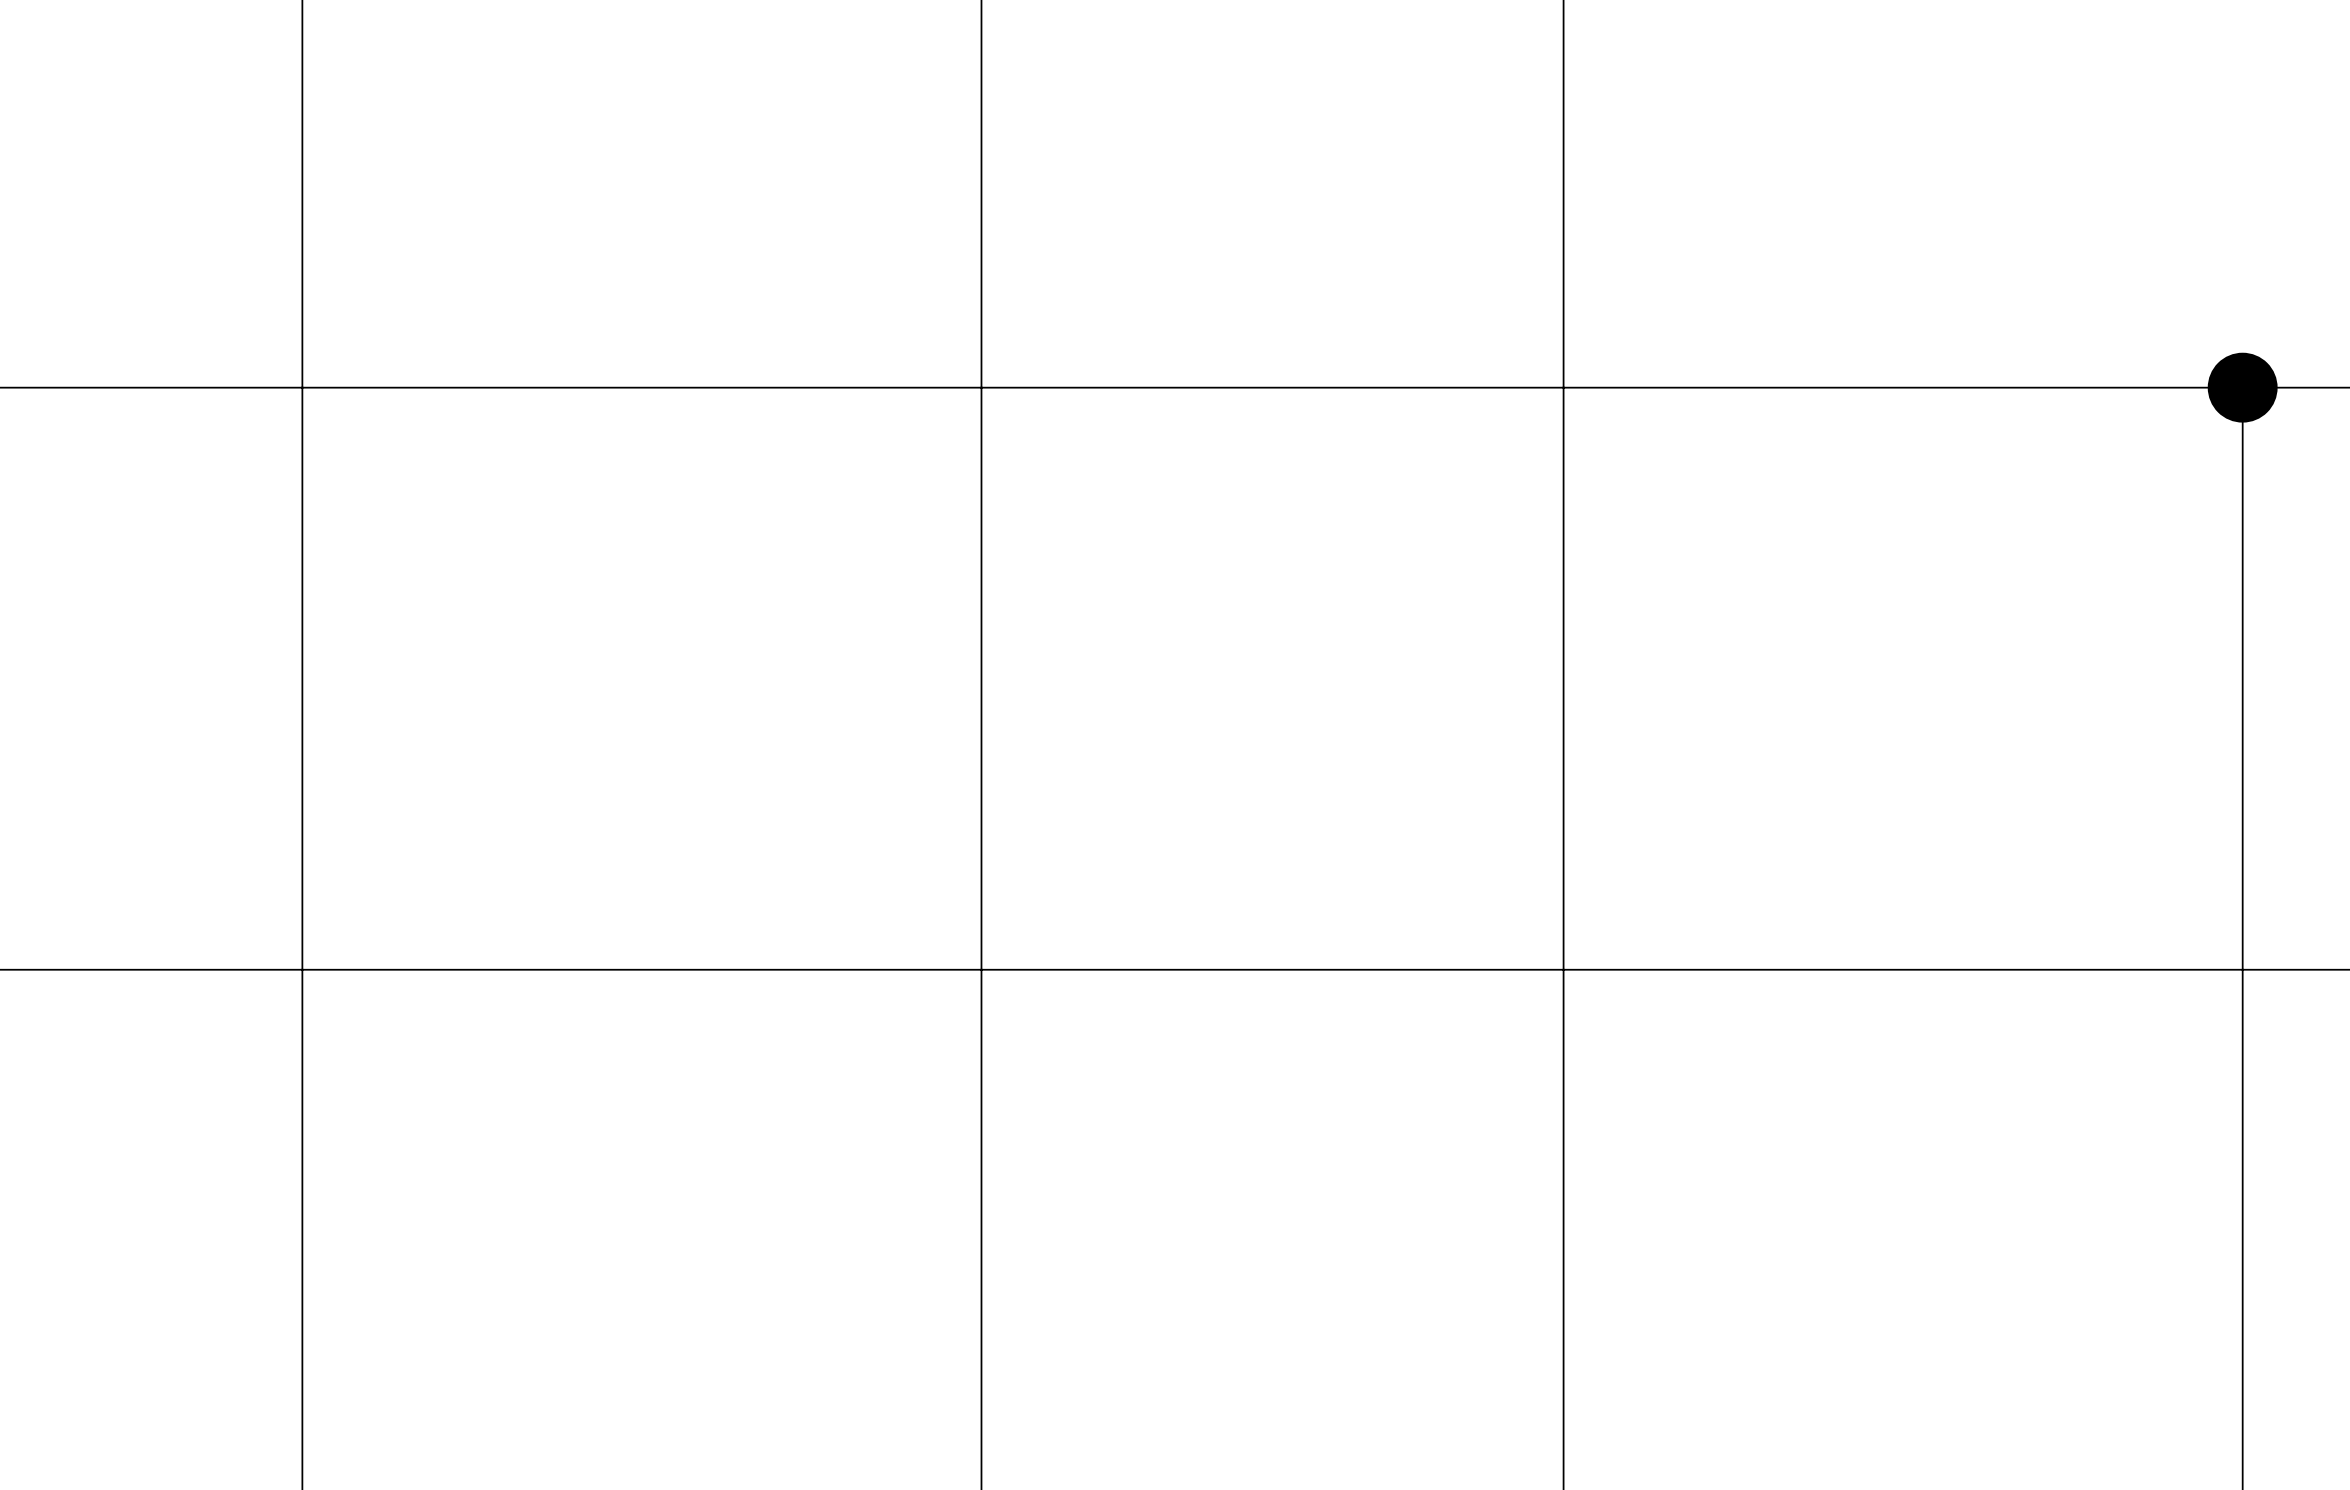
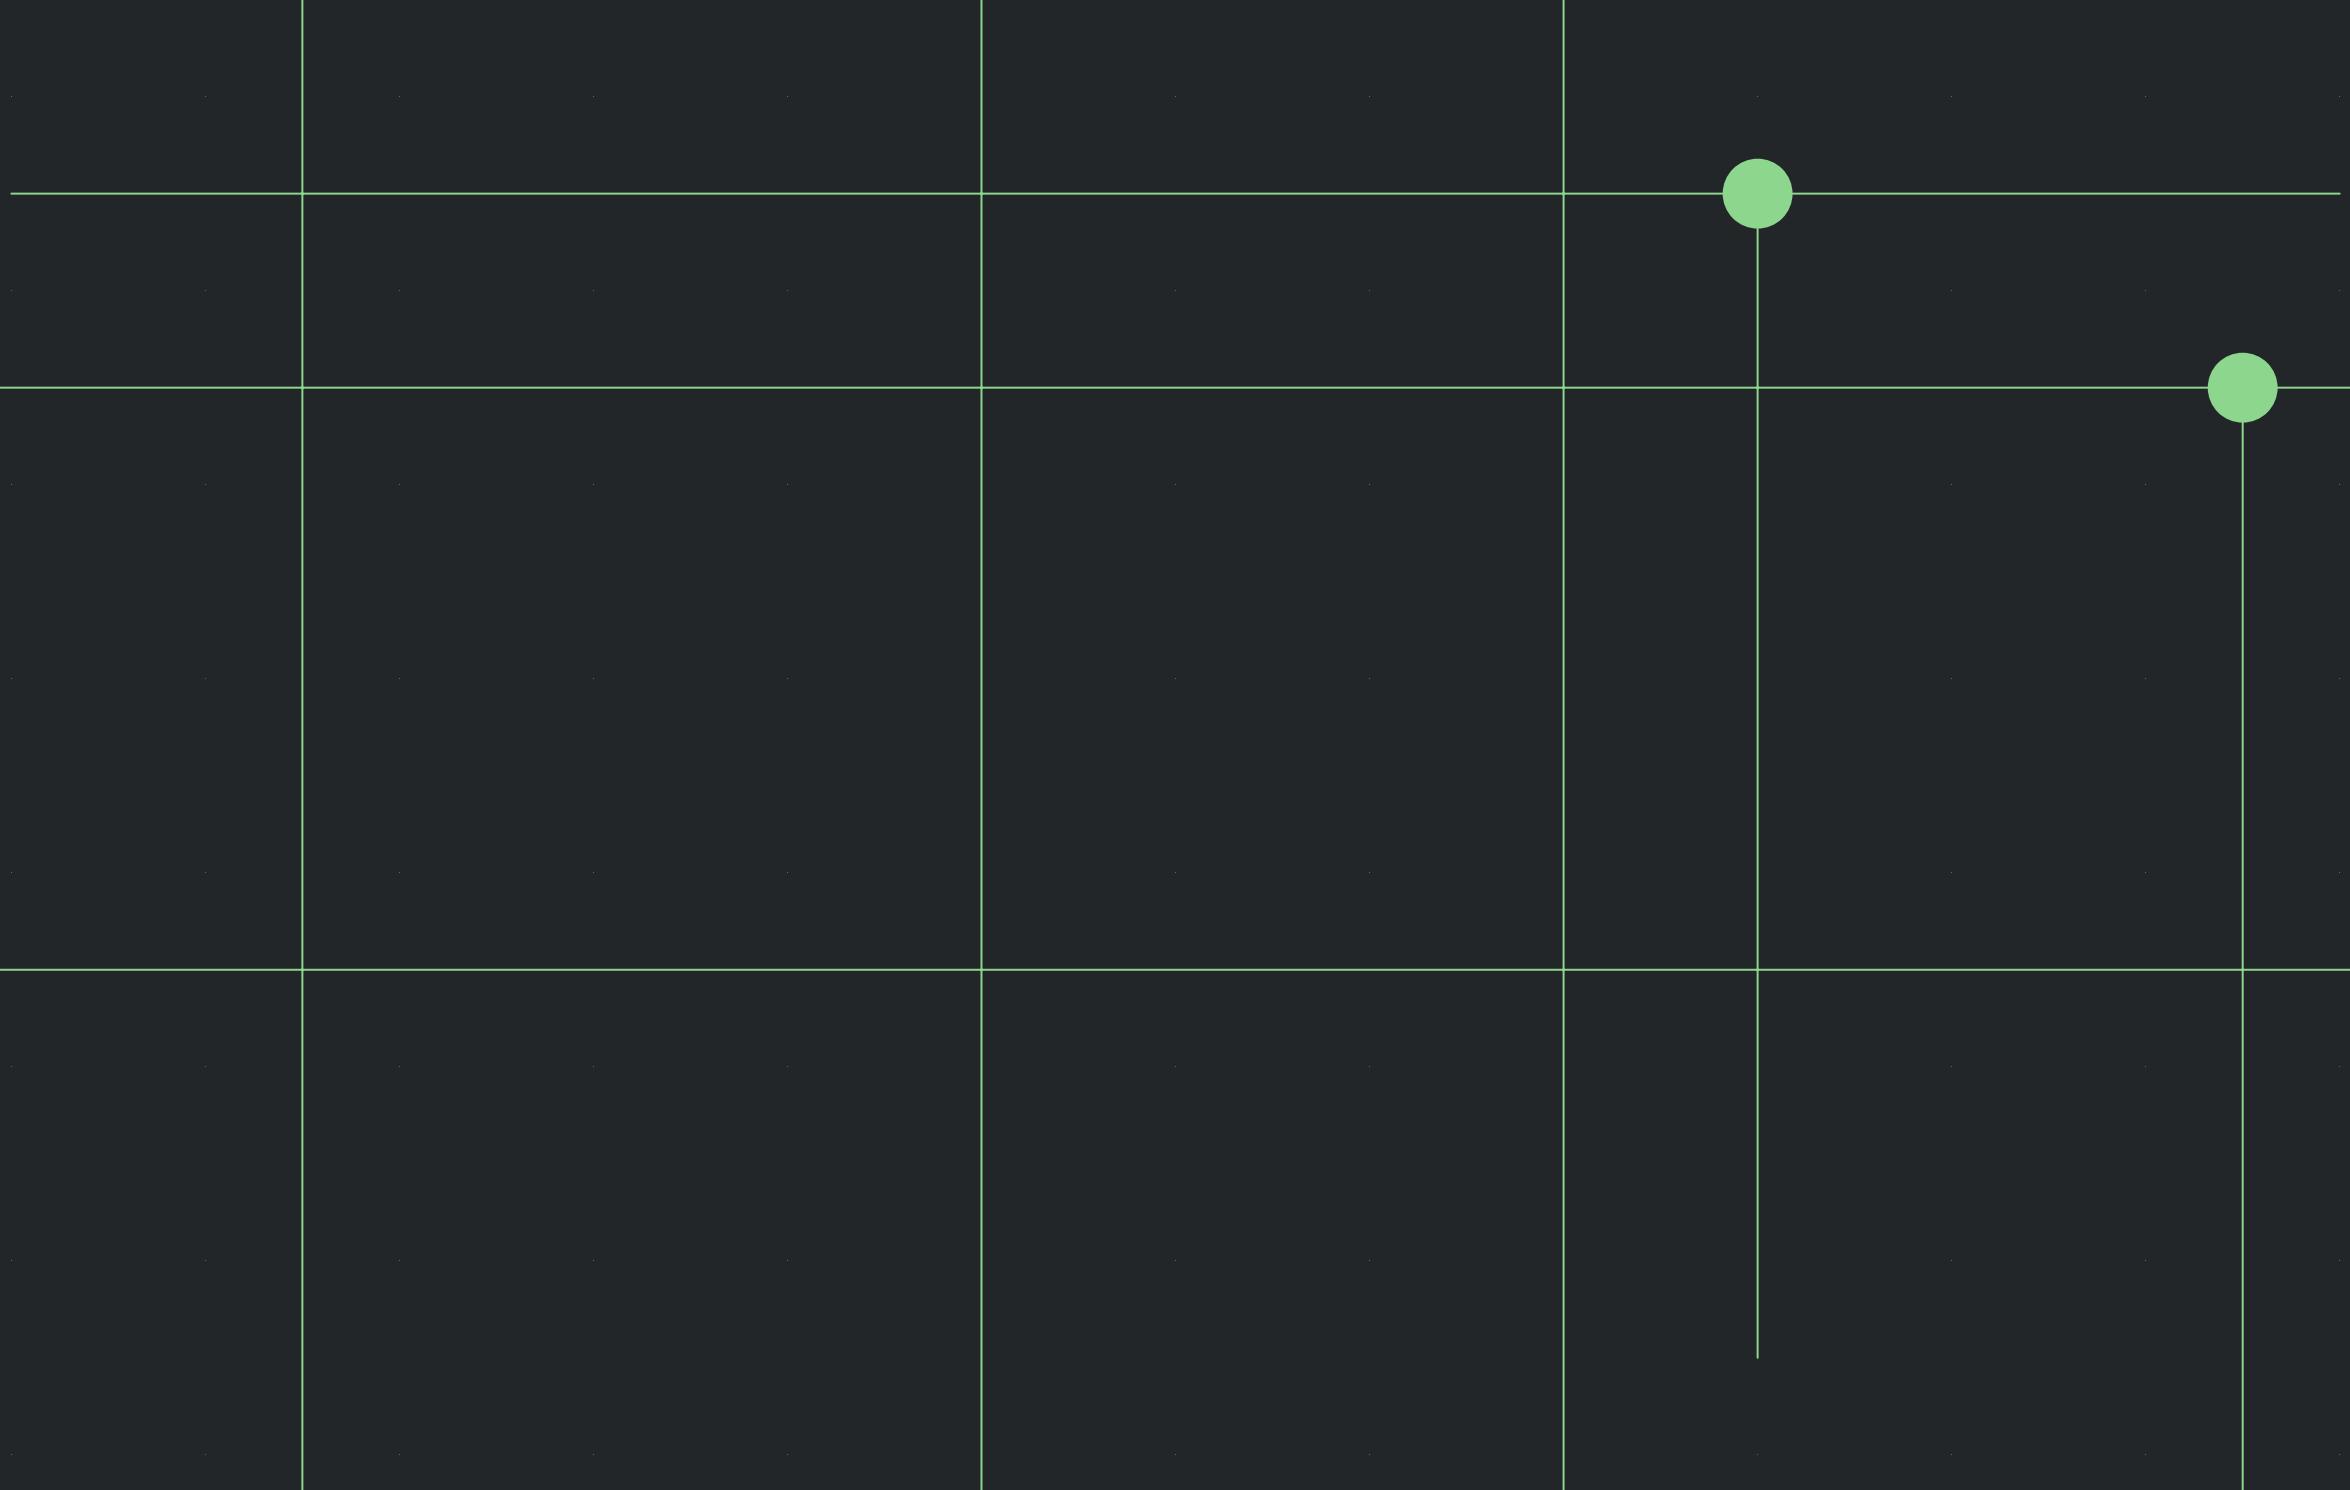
wire: none -> (11, 193) (2339, 193)
wire: none -> (1757, 193) (1757, 1357)
junction: none -> (1757, 193)

